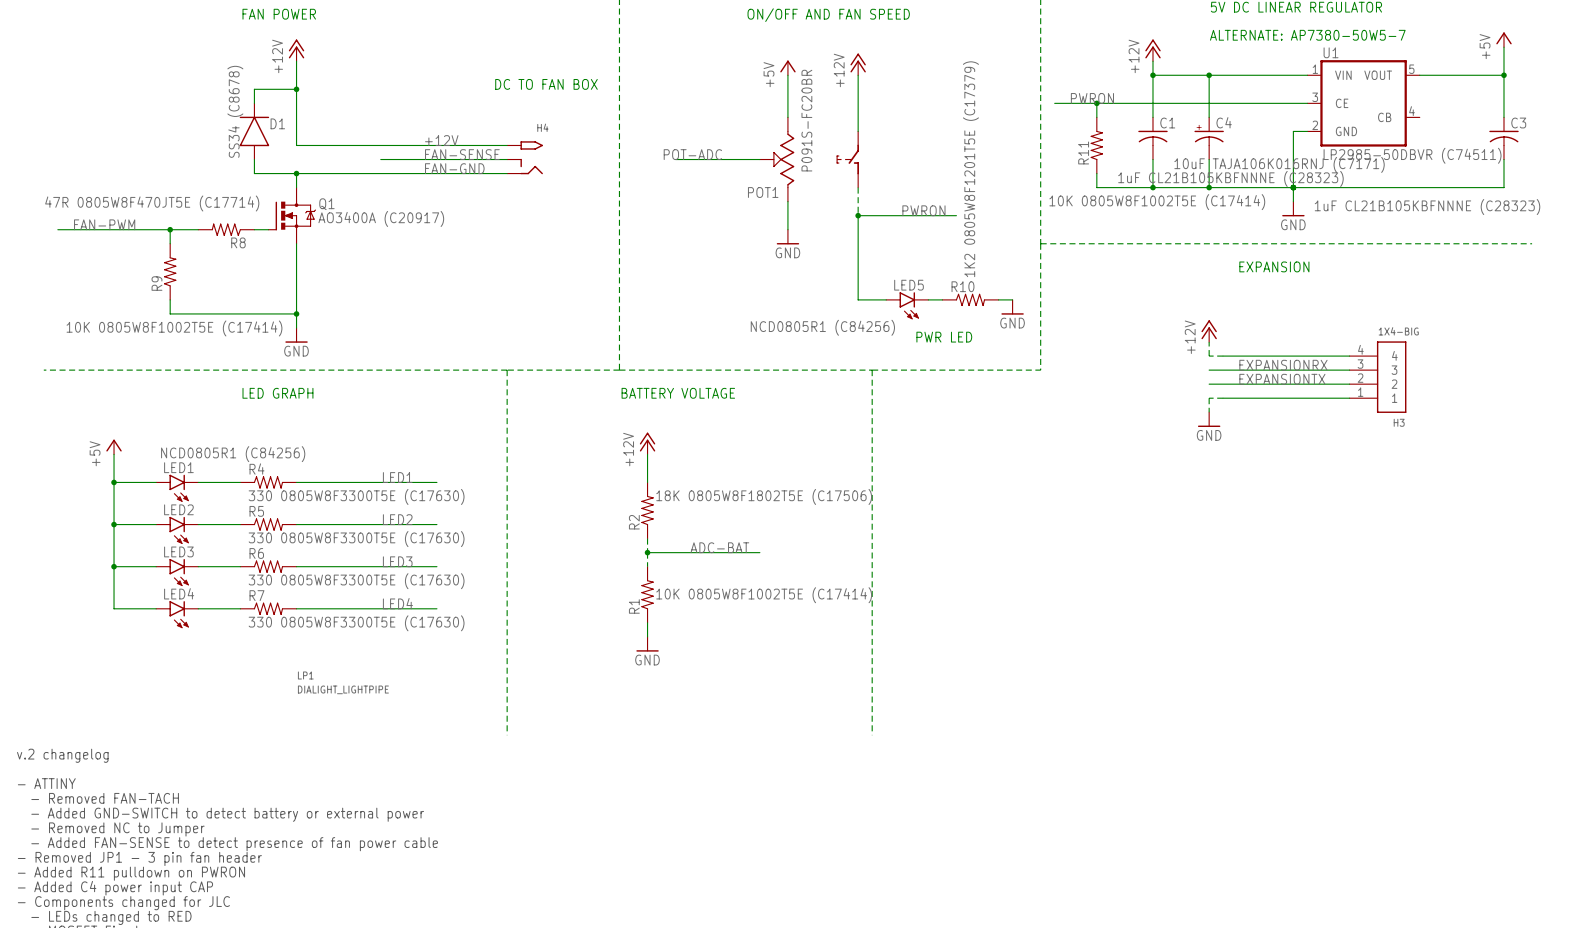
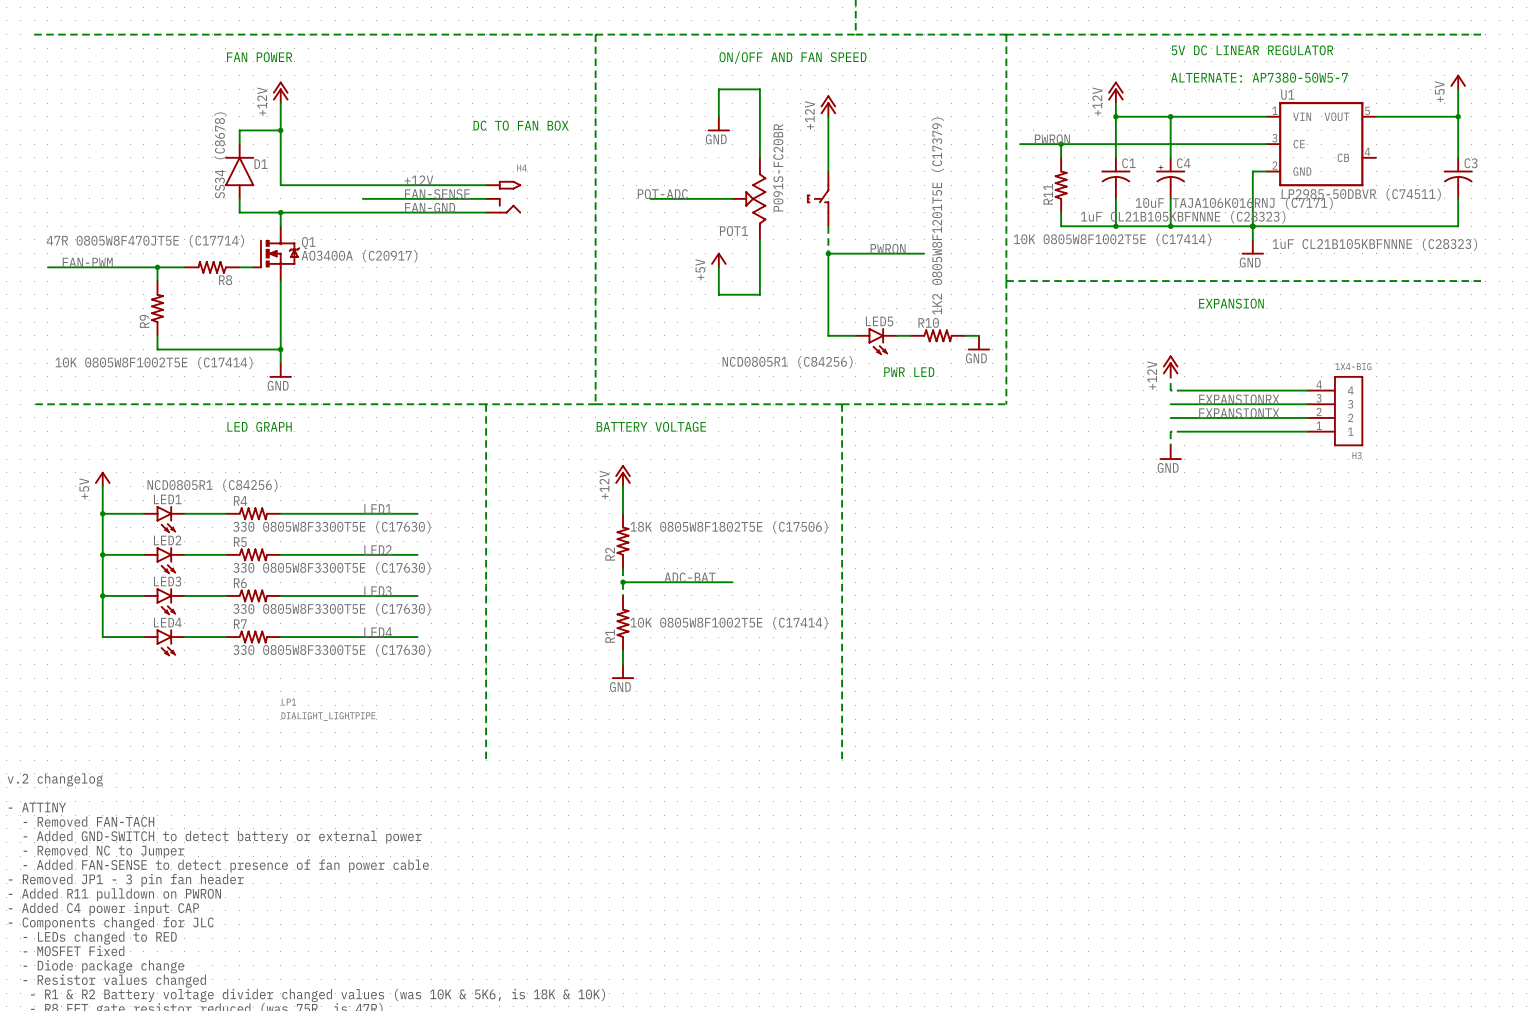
power symbol: +5V (787, 67) -> none
wire: none -> (718, 116) (718, 89) (759, 89) (759, 116)
power symbol: none -> GND (718, 123)
power symbol: none -> +5V (718, 260)
wire: none -> (718, 267) (718, 294) (759, 294) (759, 267)
power symbol: GND (787, 237) -> none

